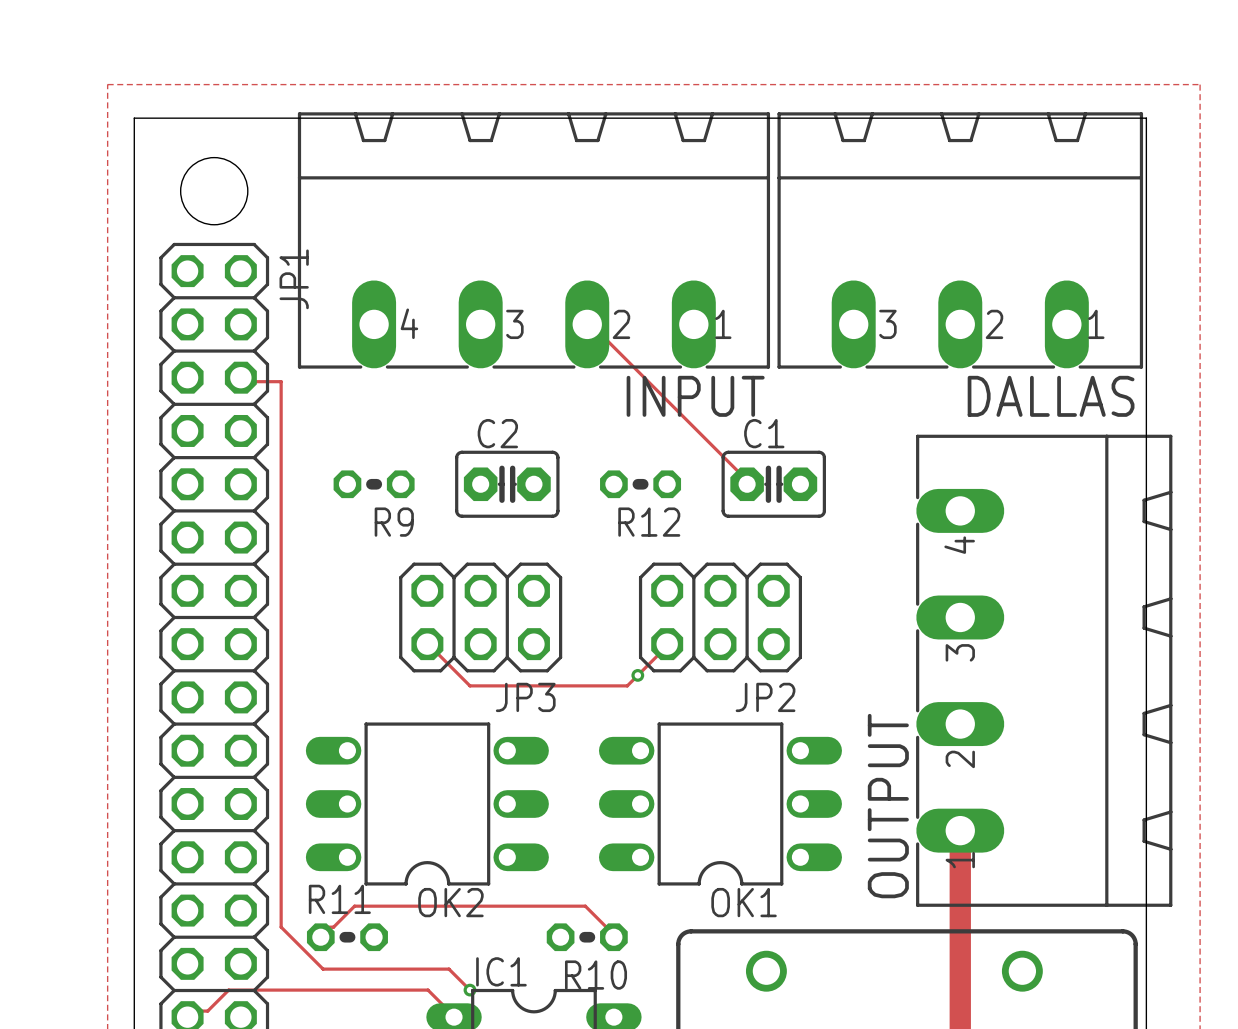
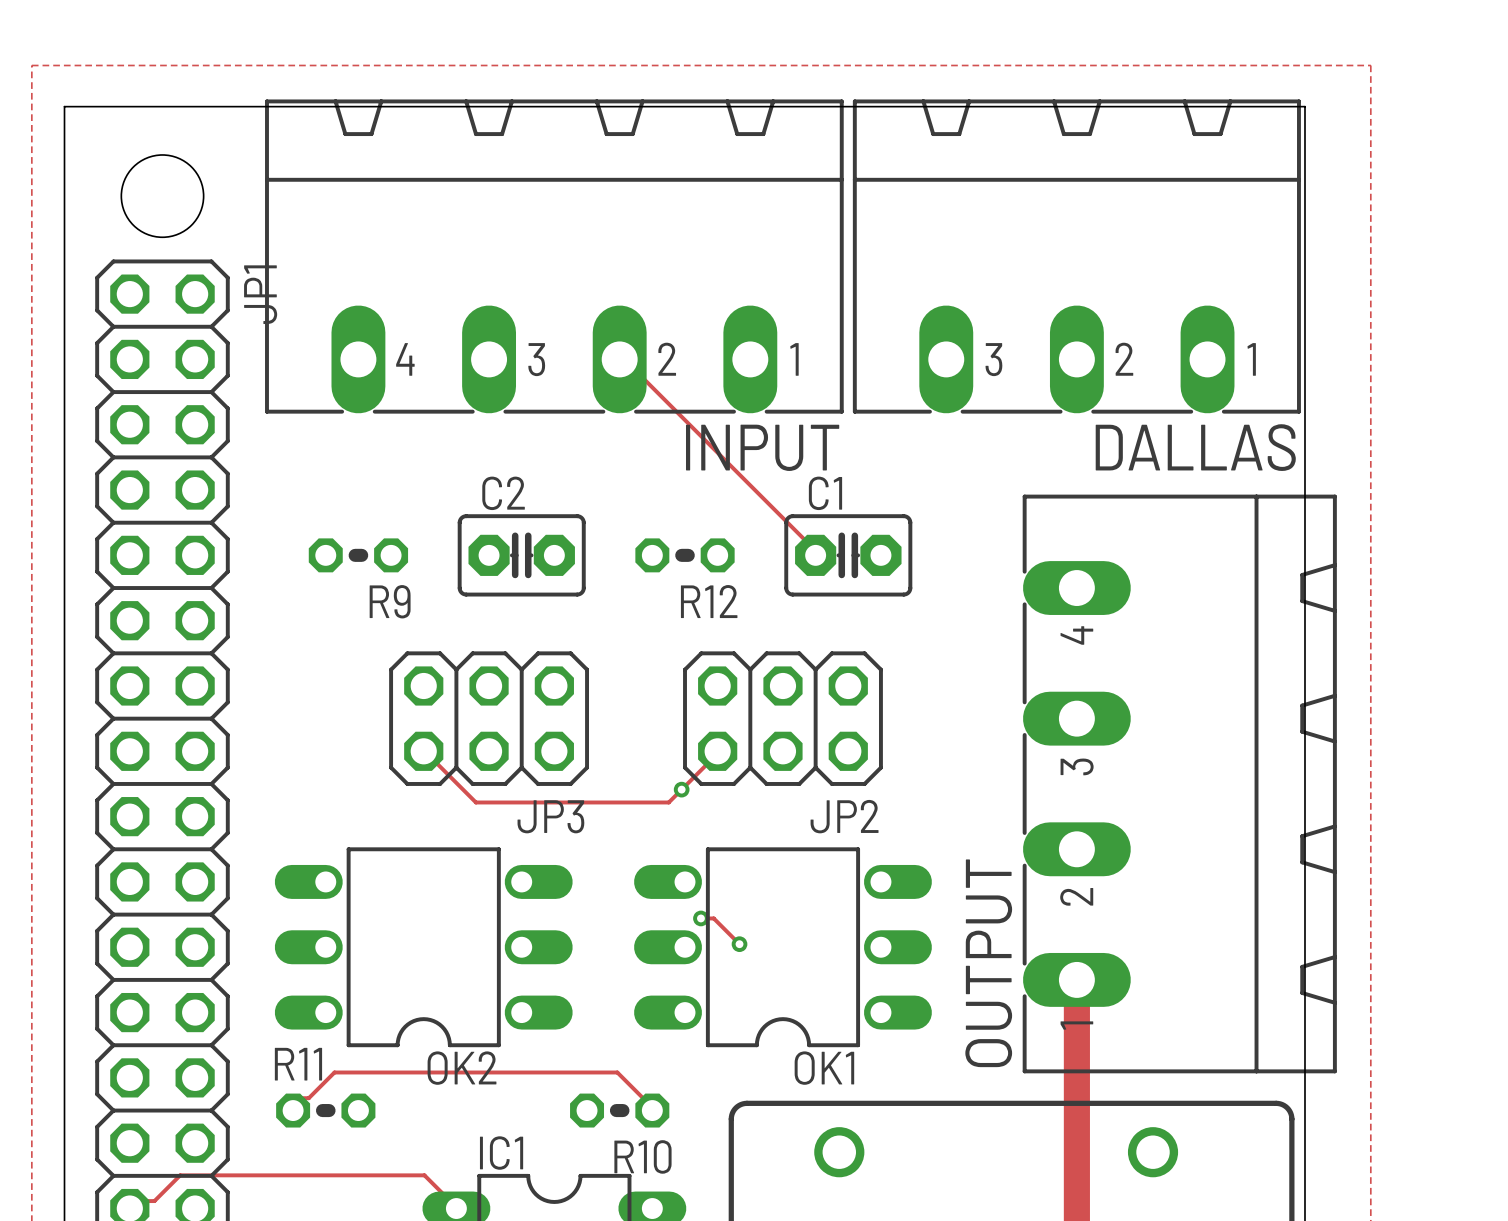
track: (240, 377) (249, 381) (281, 381) (281, 927) (323, 969) (448, 969) (469, 990) -> none
track: none -> (700, 918) (713, 918) (739, 944)
via: none -> (700, 918)
via: none -> (739, 944)
via: (469, 990) -> none

